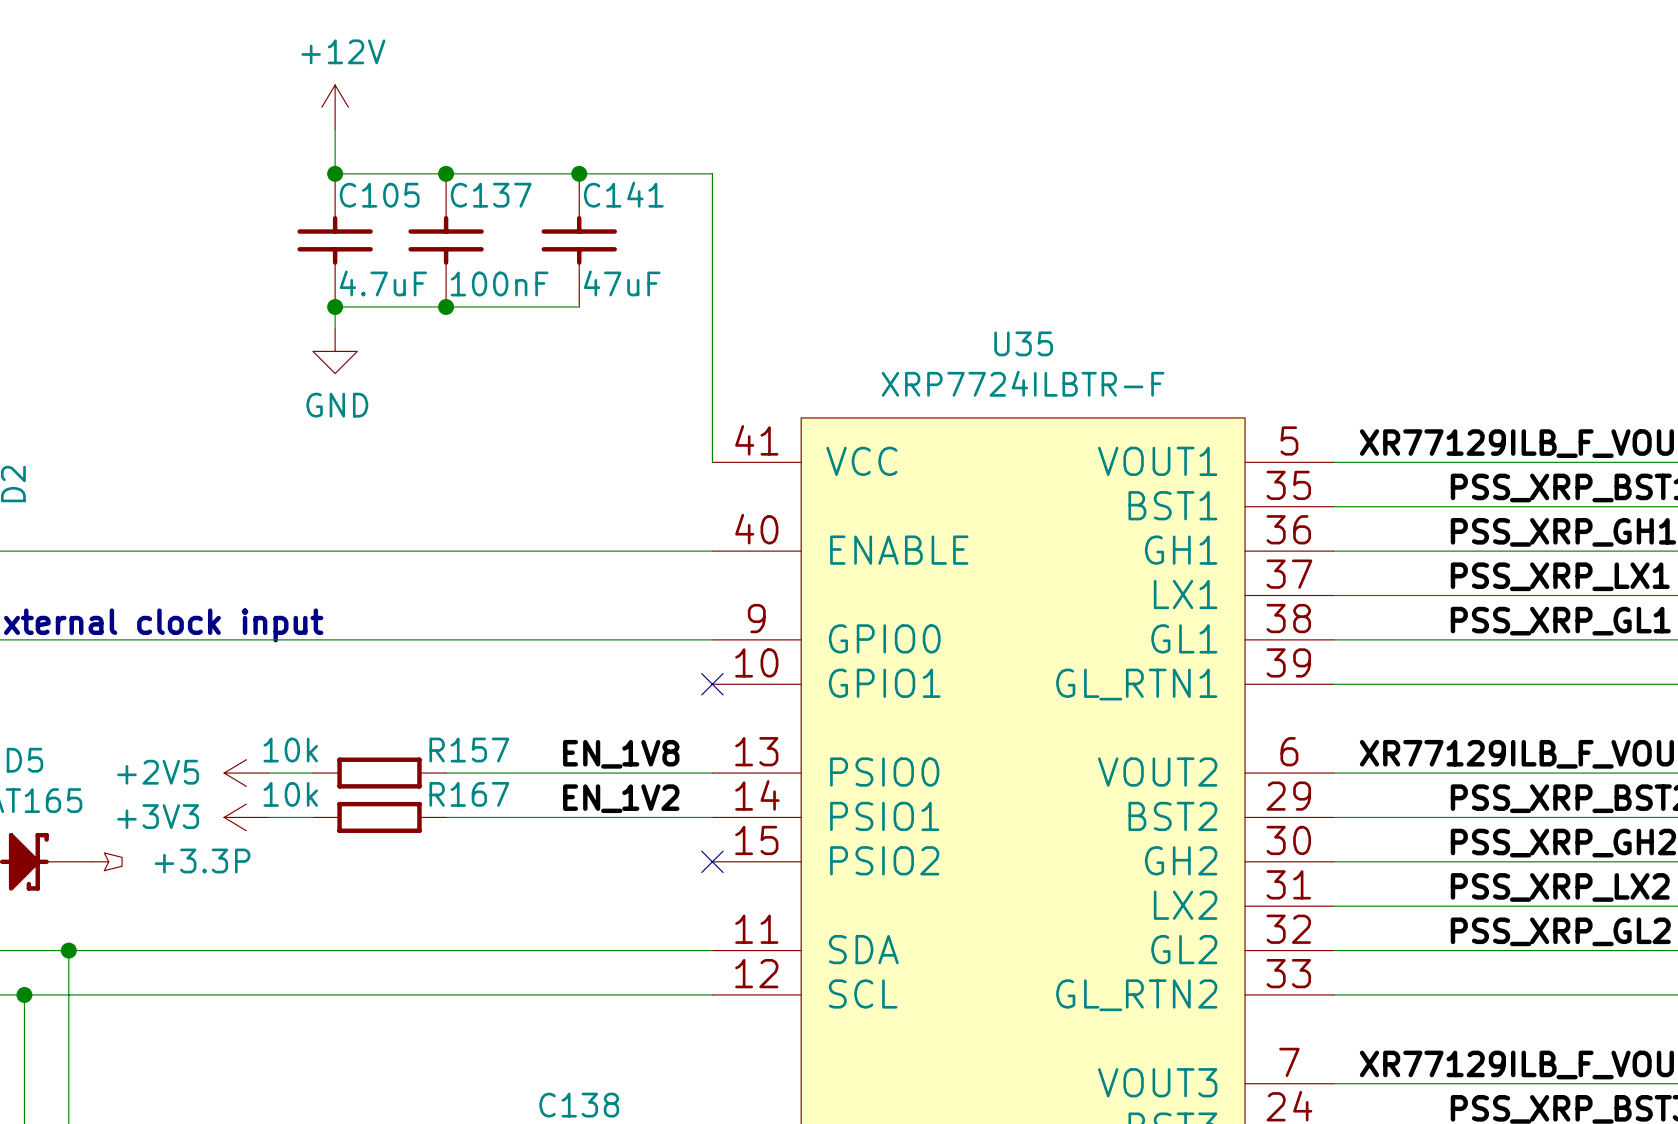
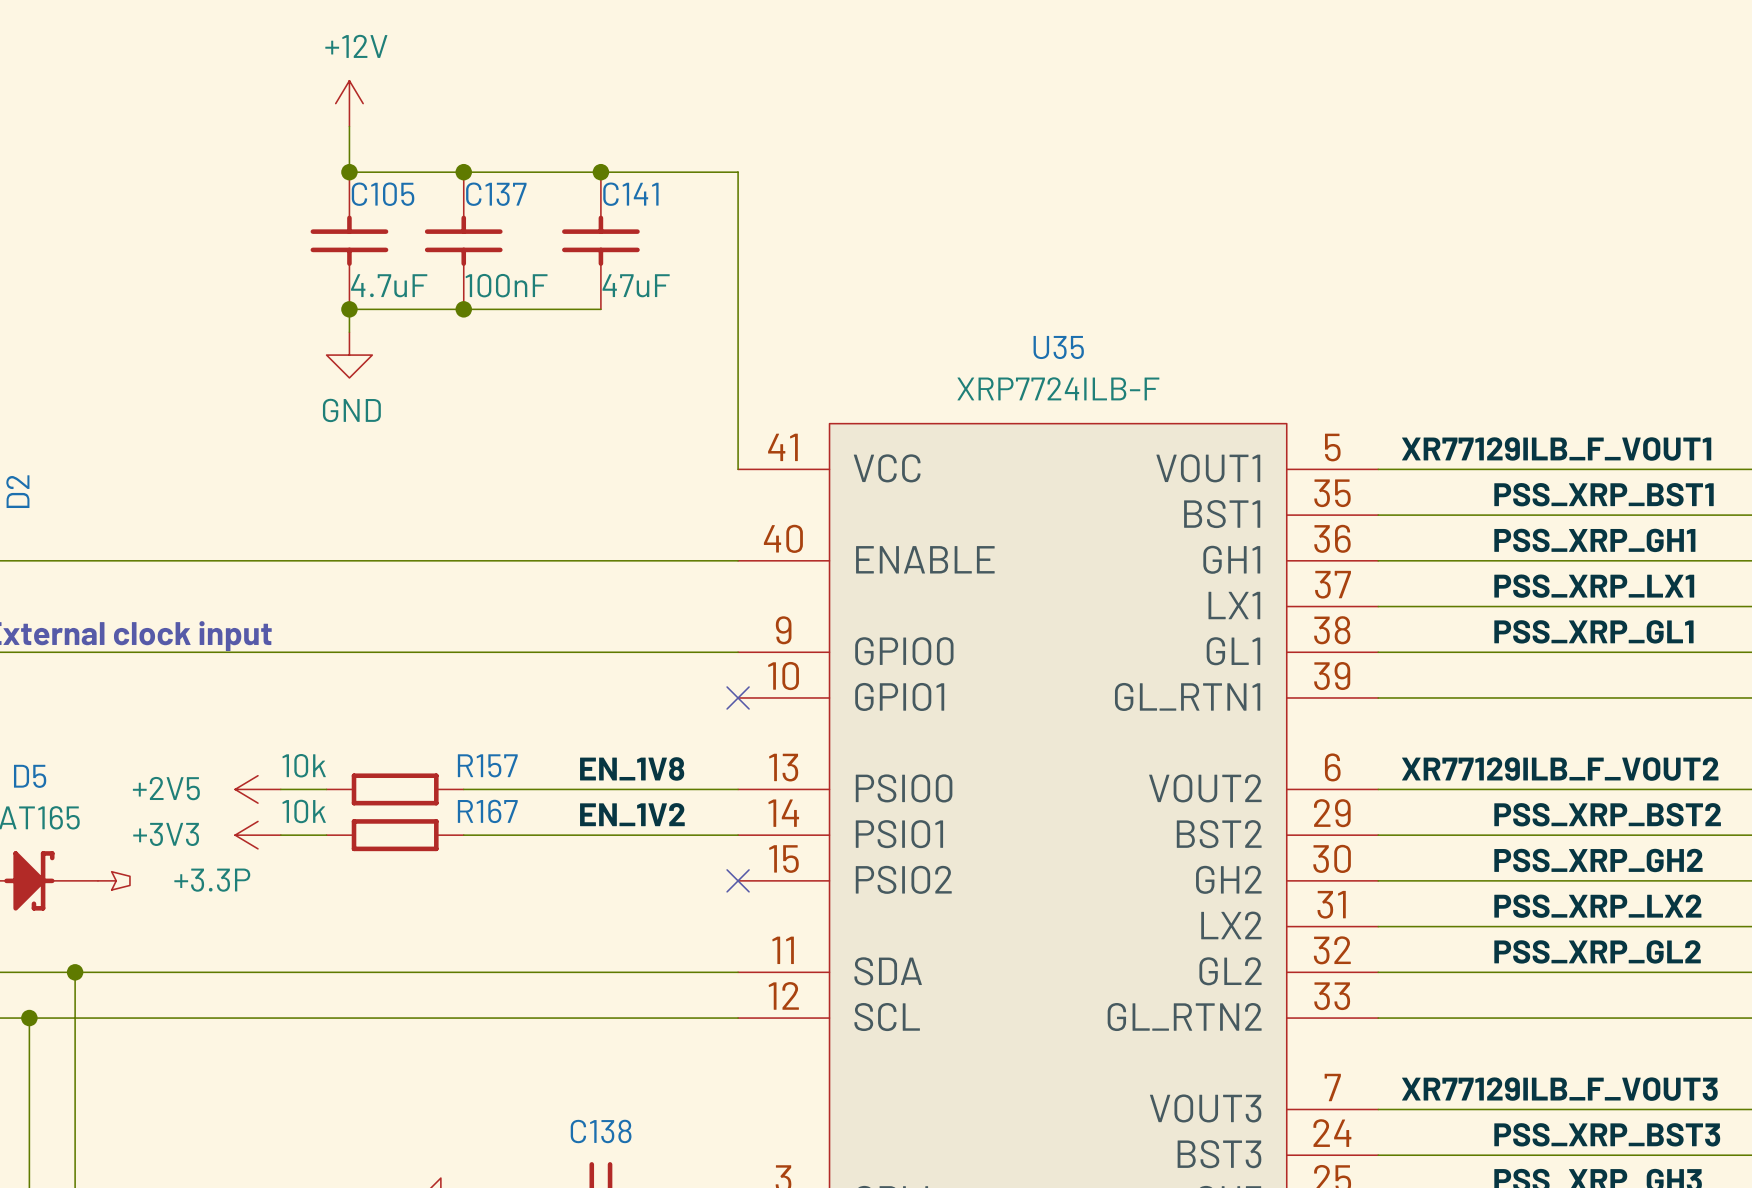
U35 value: XRP7724ILBTR-F (1023, 383) -> XRP7724ILB-F (1058, 388)

